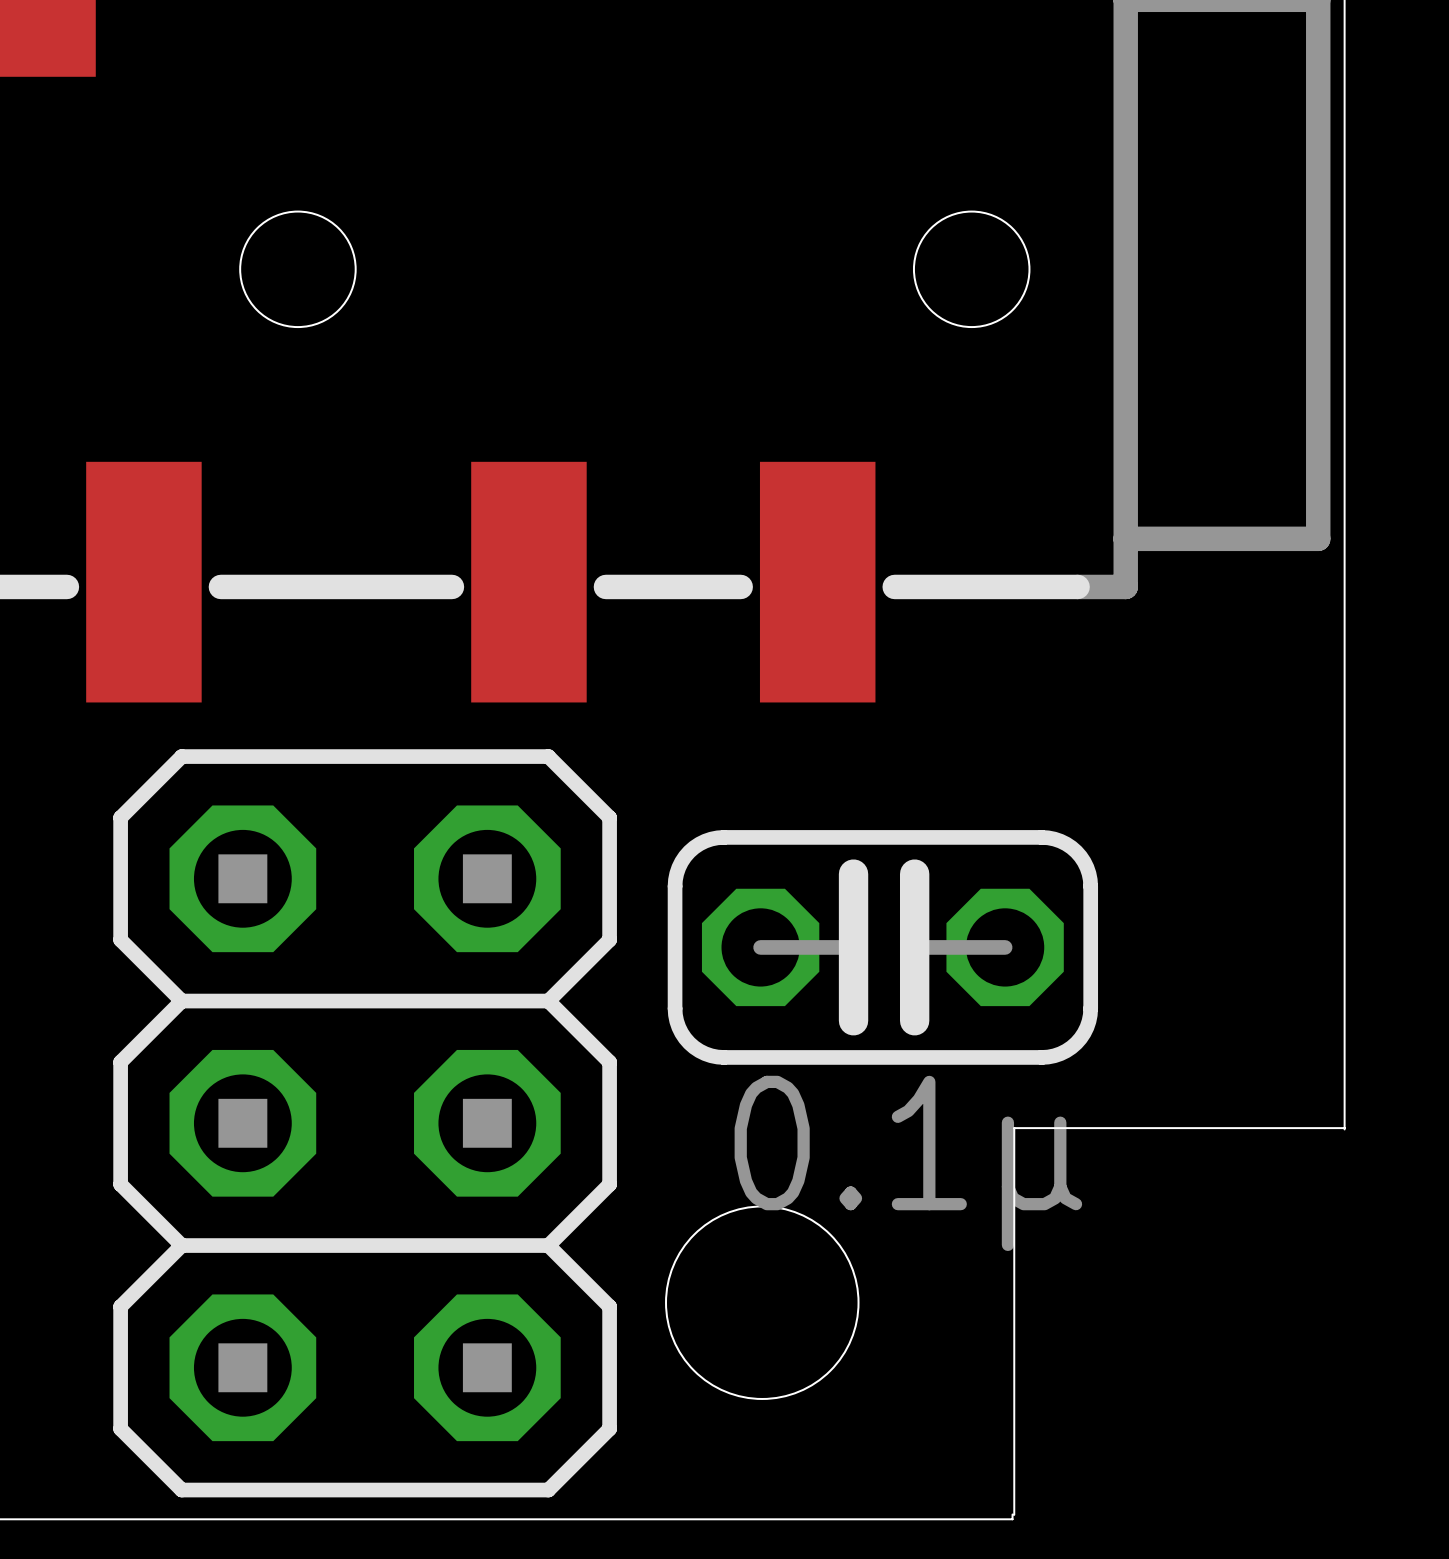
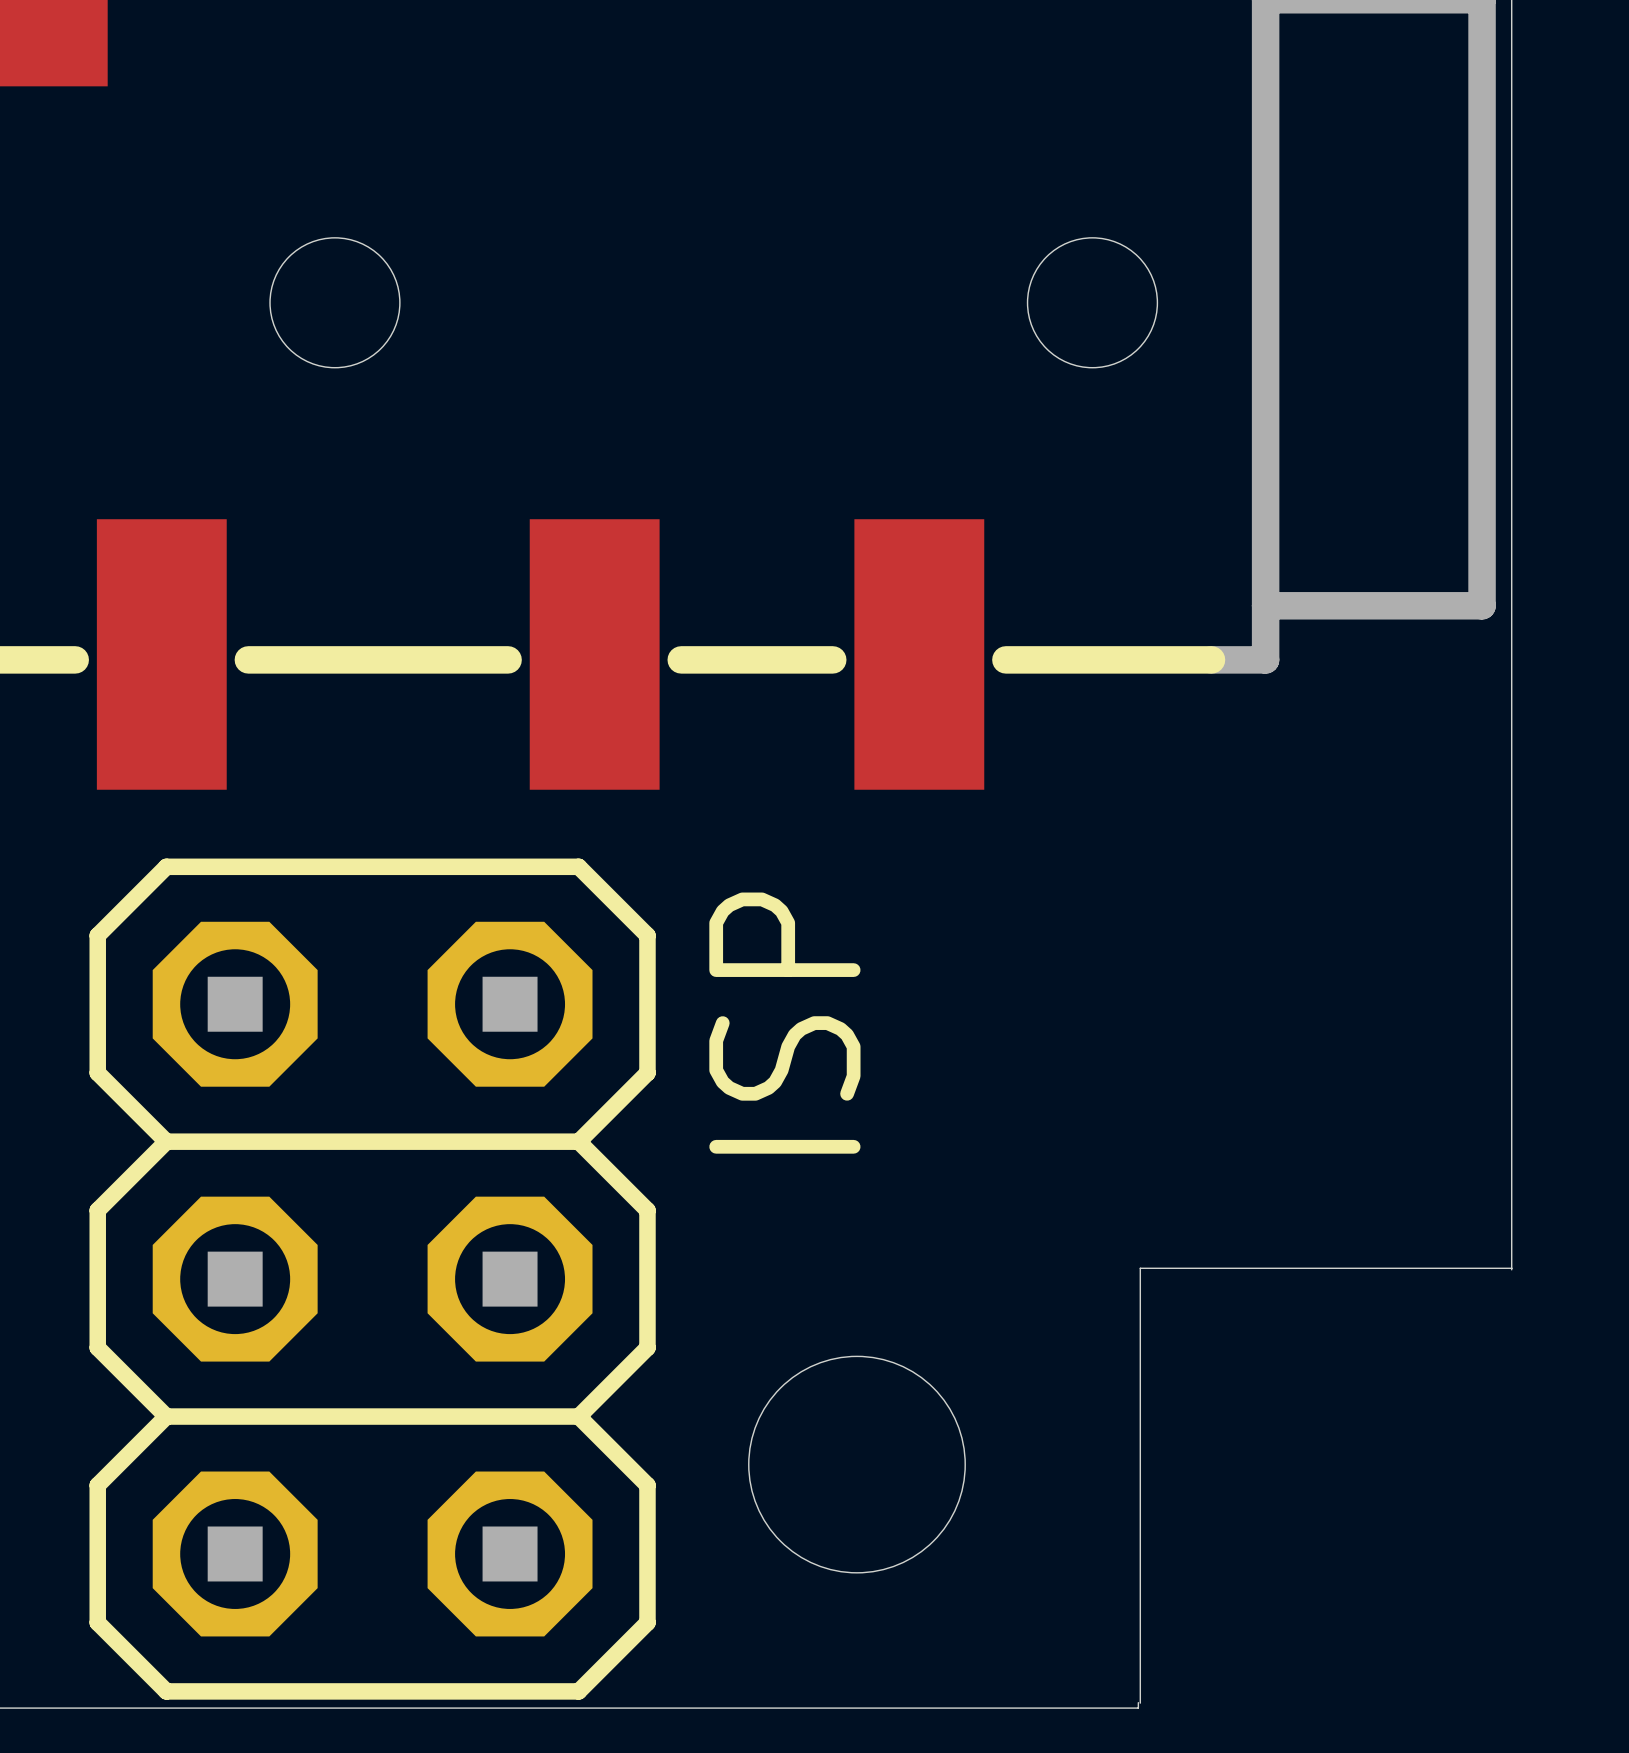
ISP name: none -> ISP (784, 1023)
part: 0.1µ (882, 947) -> none
ISP position: (365, 1123) -> (372, 1279)

